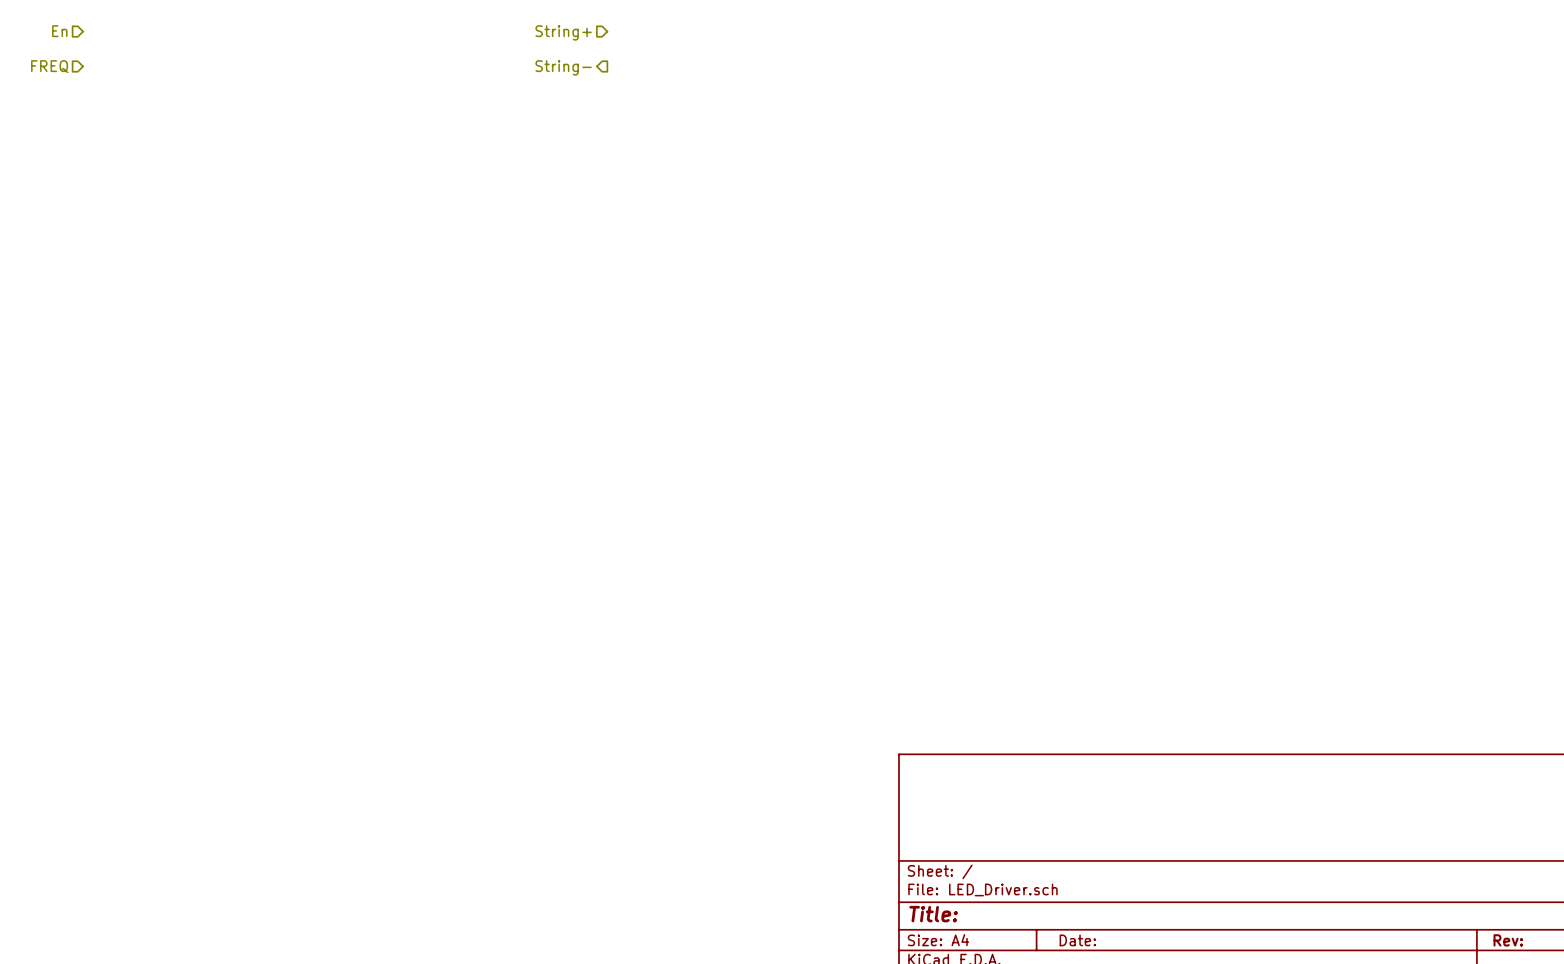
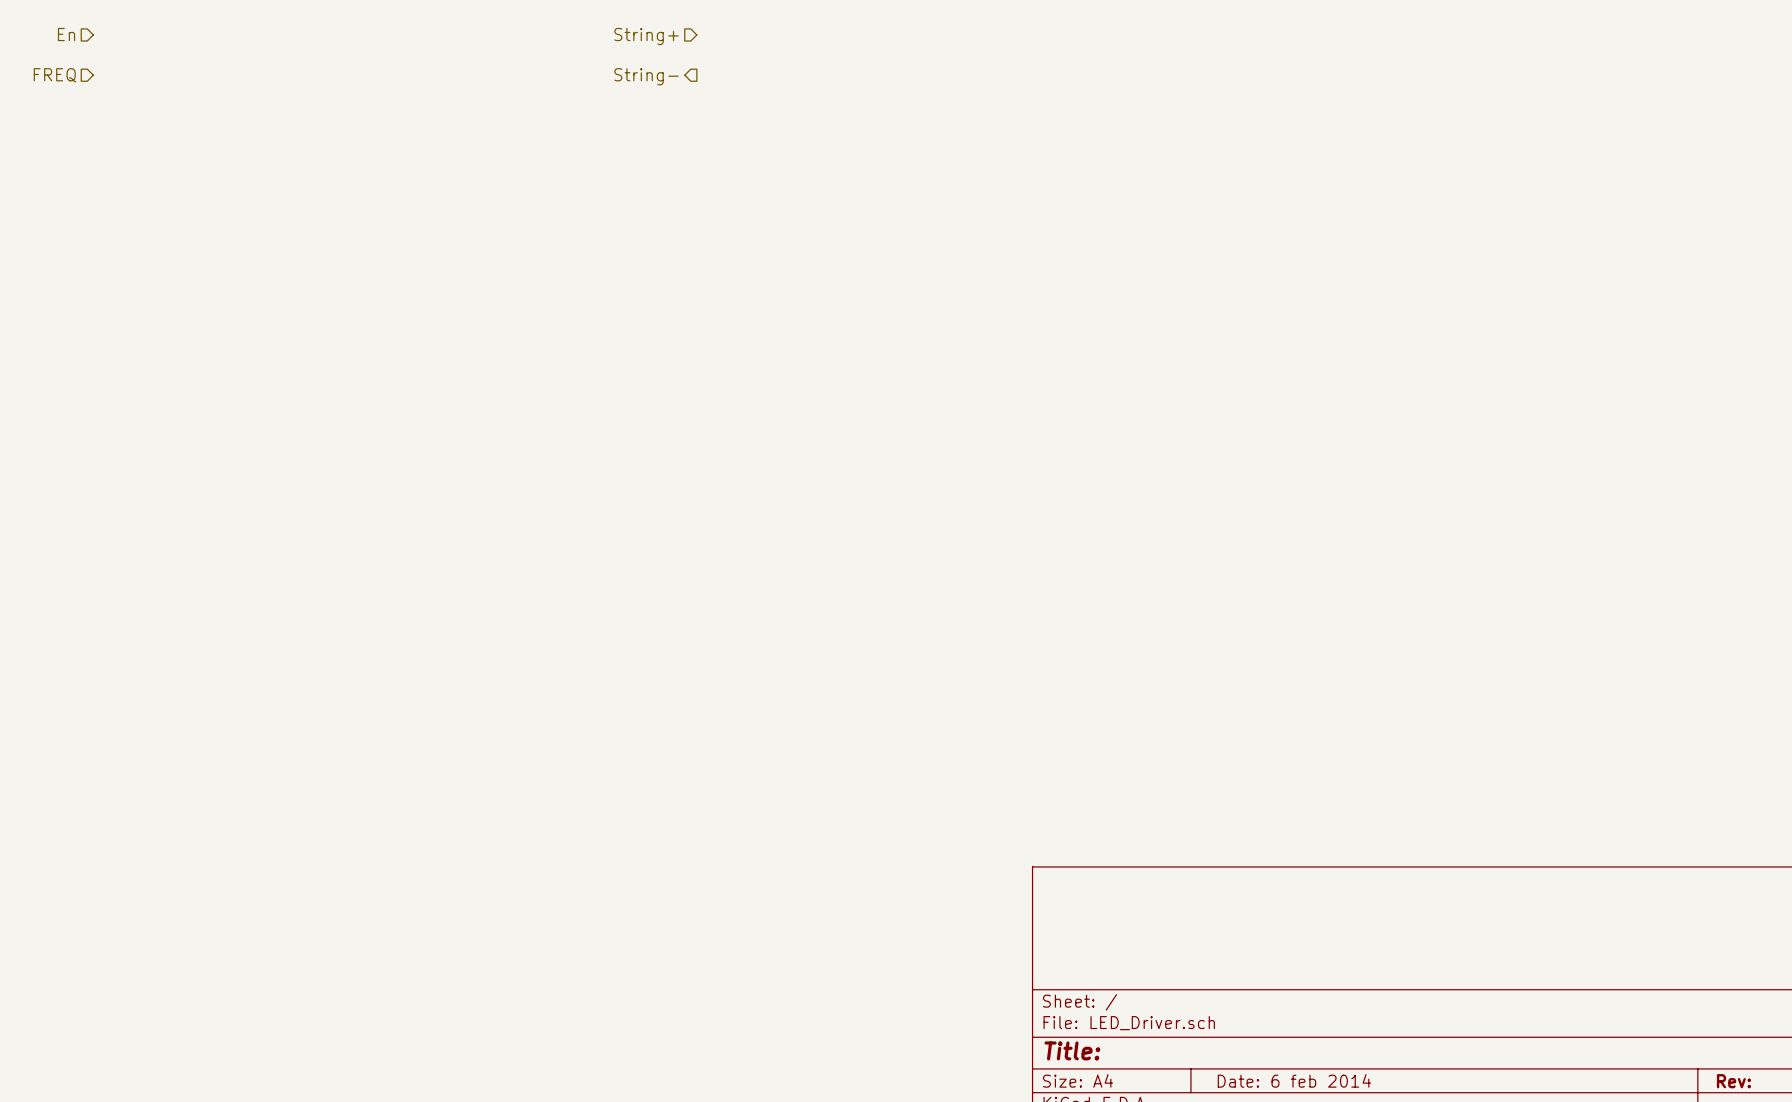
title block: Date: (1077, 940) -> Date: 6 feb 2014 (1294, 1080)

